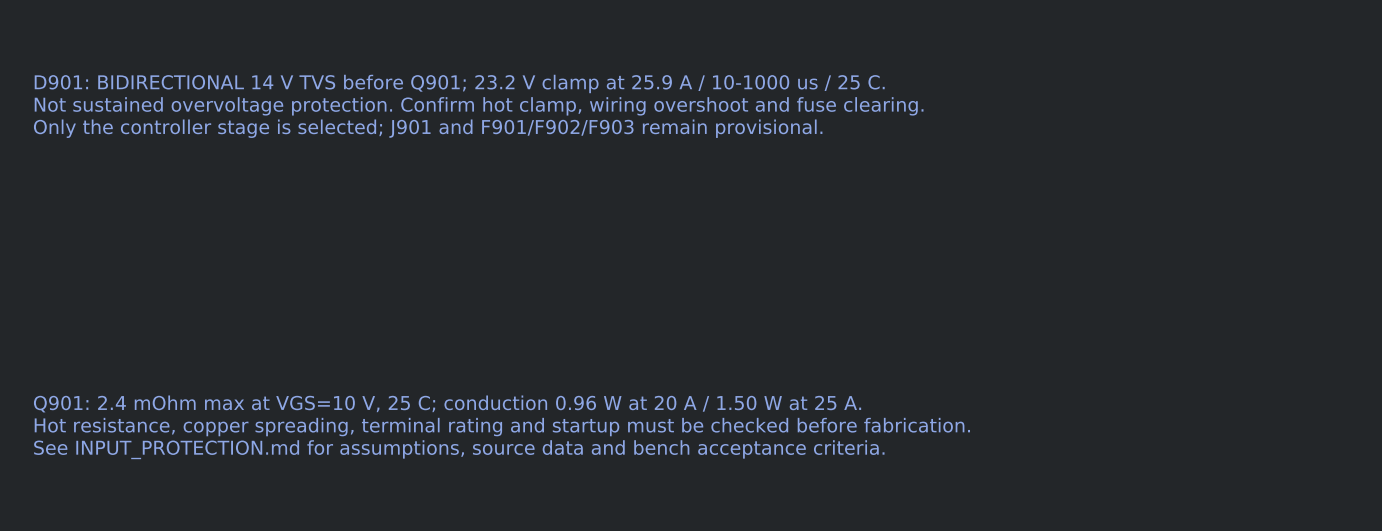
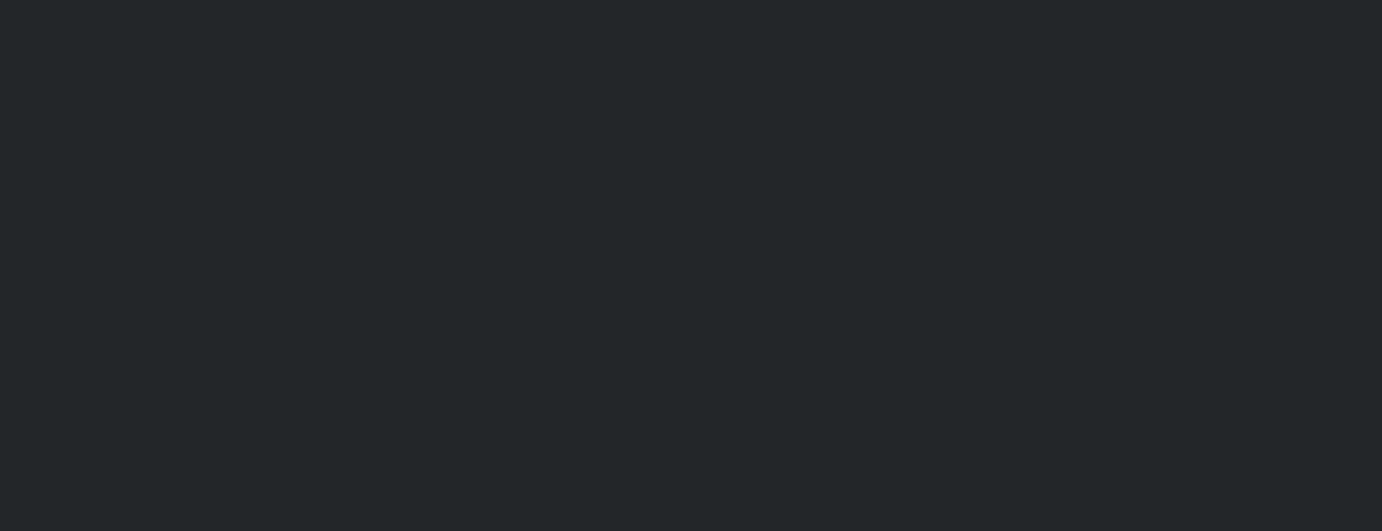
text: D901: BIDIRECTIONAL 14 V TVS before Q901; 23.2 V clamp at 25.9 A / 10-1000 us / 25 C. (459, 83) -> none
text: Not sustained overvoltage protection. Confirm hot clamp, wiring overshoot and fuse clearing. (479, 106) -> none
text: Only the controller stage is selected; J901 and F901/F902/F903 remain provisional. (428, 128) -> none
text: Q901: 2.4 mOhm max at VGS=10 V, 25 C; conduction 0.96 W at 20 A / 1.50 W at 25 A. (447, 403) -> none
text: Hot resistance, copper spreading, terminal rating and startup must be checked before fabrication. (502, 427) -> none
text: See INPUT_PROTECTION.md for assumptions, source data and bench acceptance criteria. (459, 449) -> none

